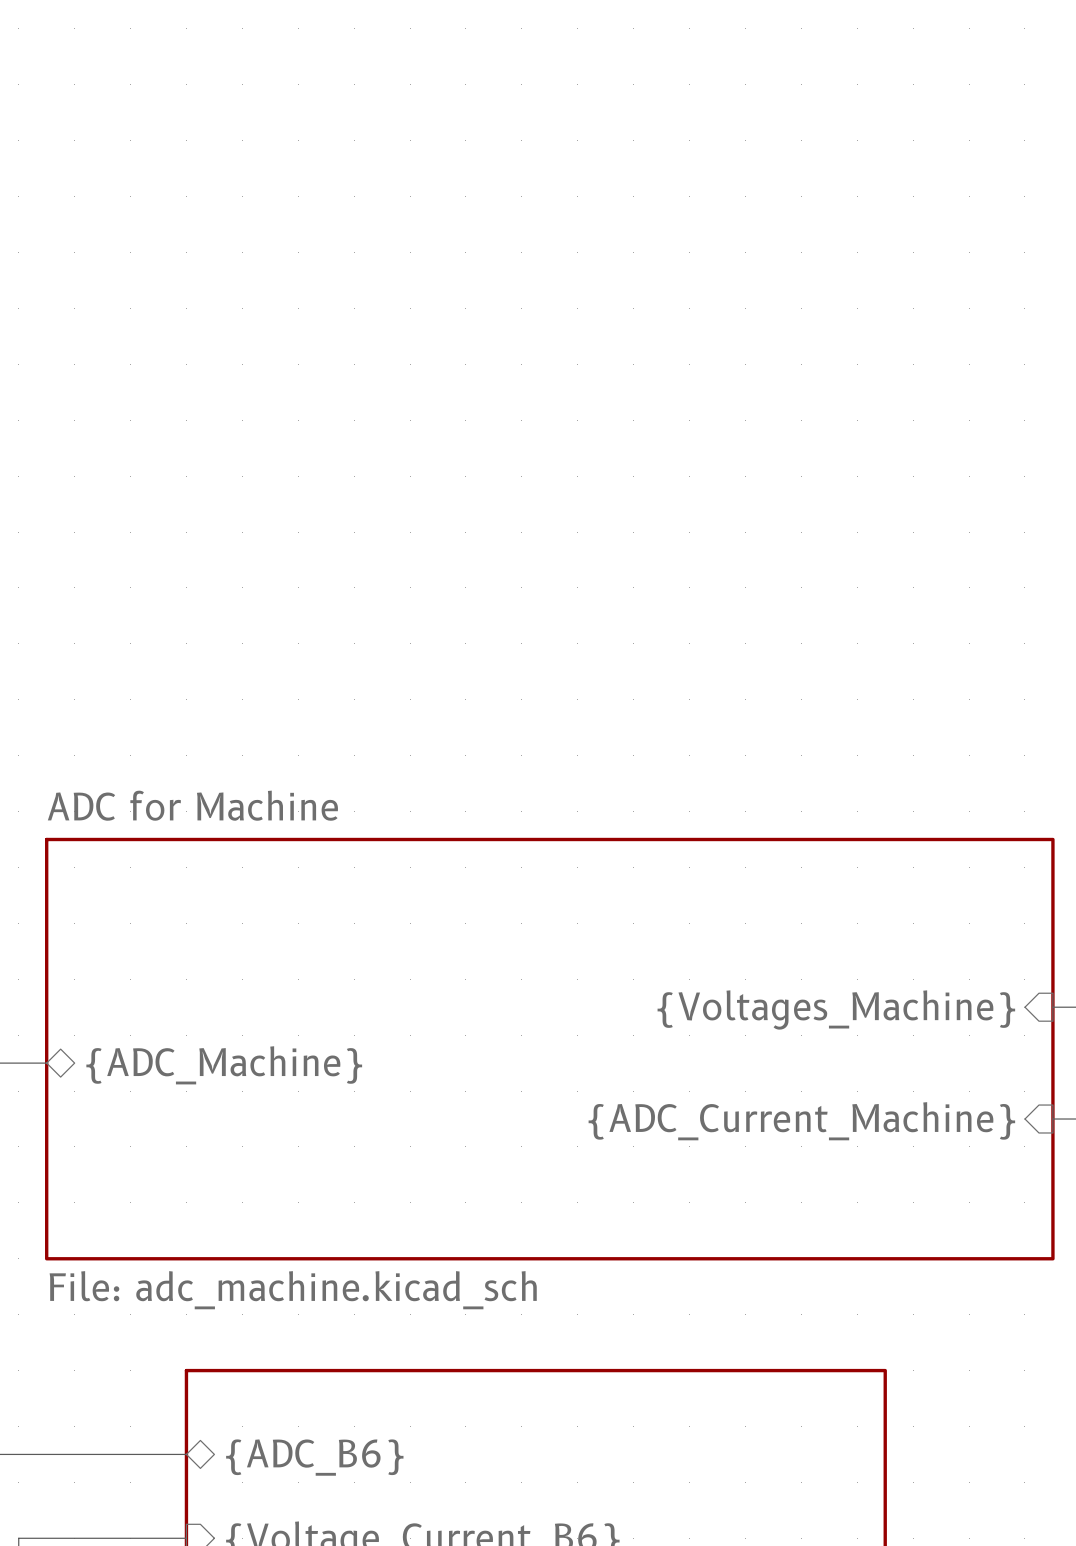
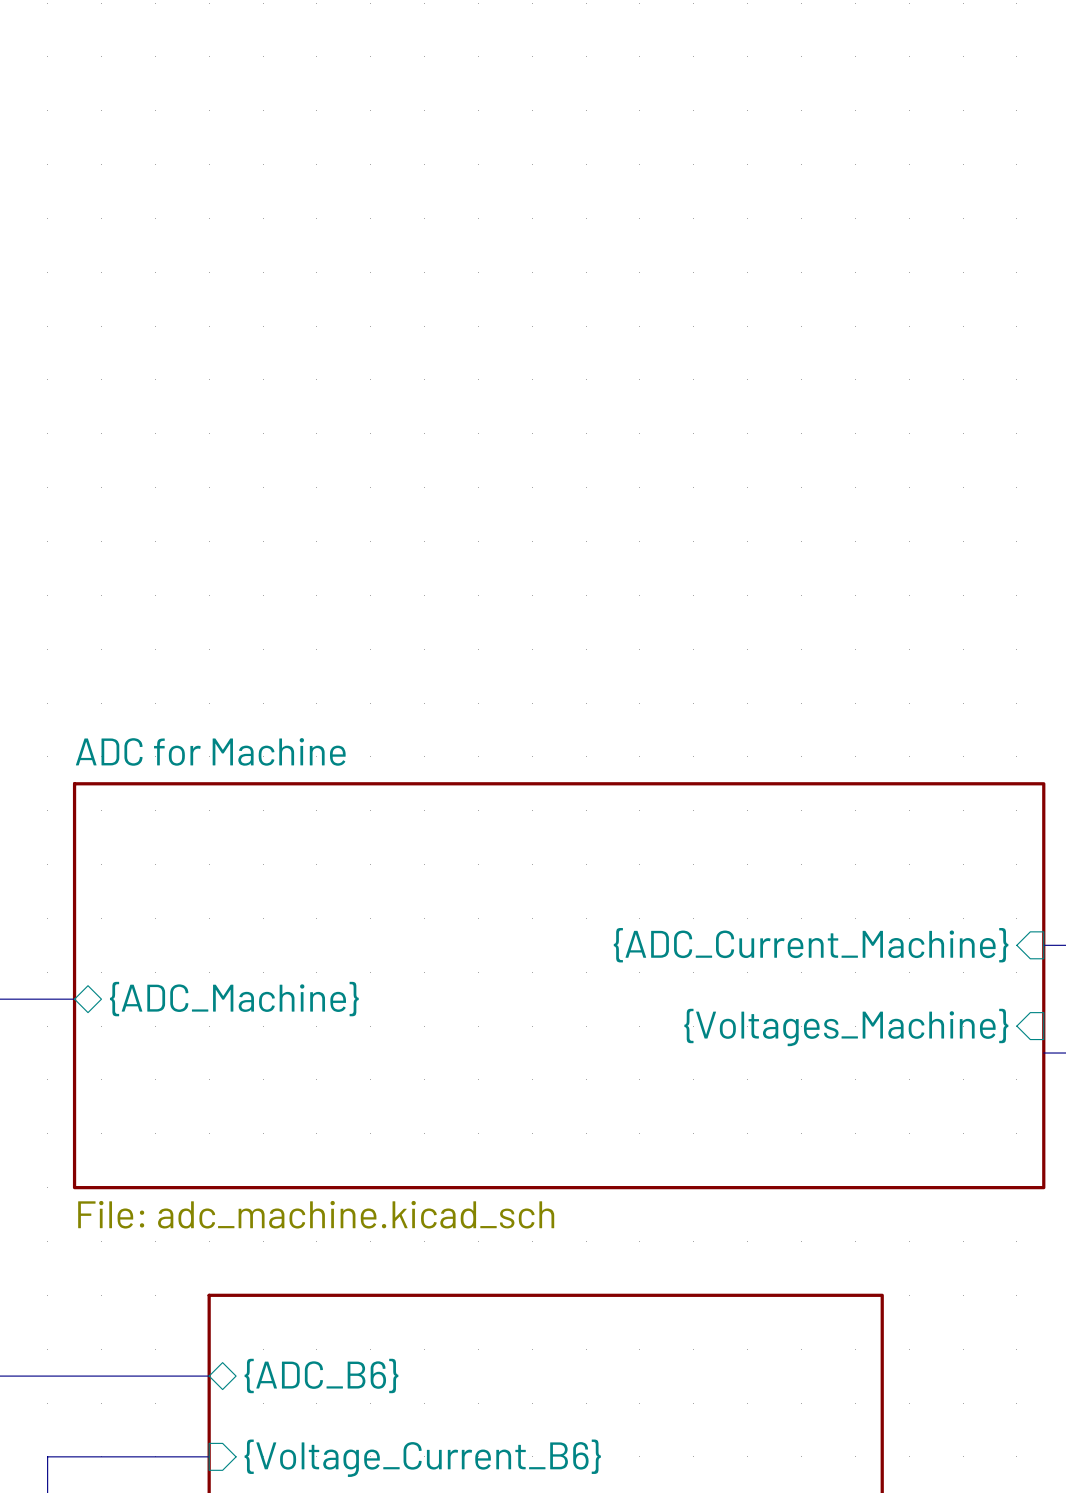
sheet pin: {Voltages_Machine} (836, 1009) -> {ADC_Current_Machine} (811, 945)
sheet pin: none -> {Voltages_Machine} (846, 1027)
sheet pin: {ADC_Current_Machine} (801, 1121) -> none

